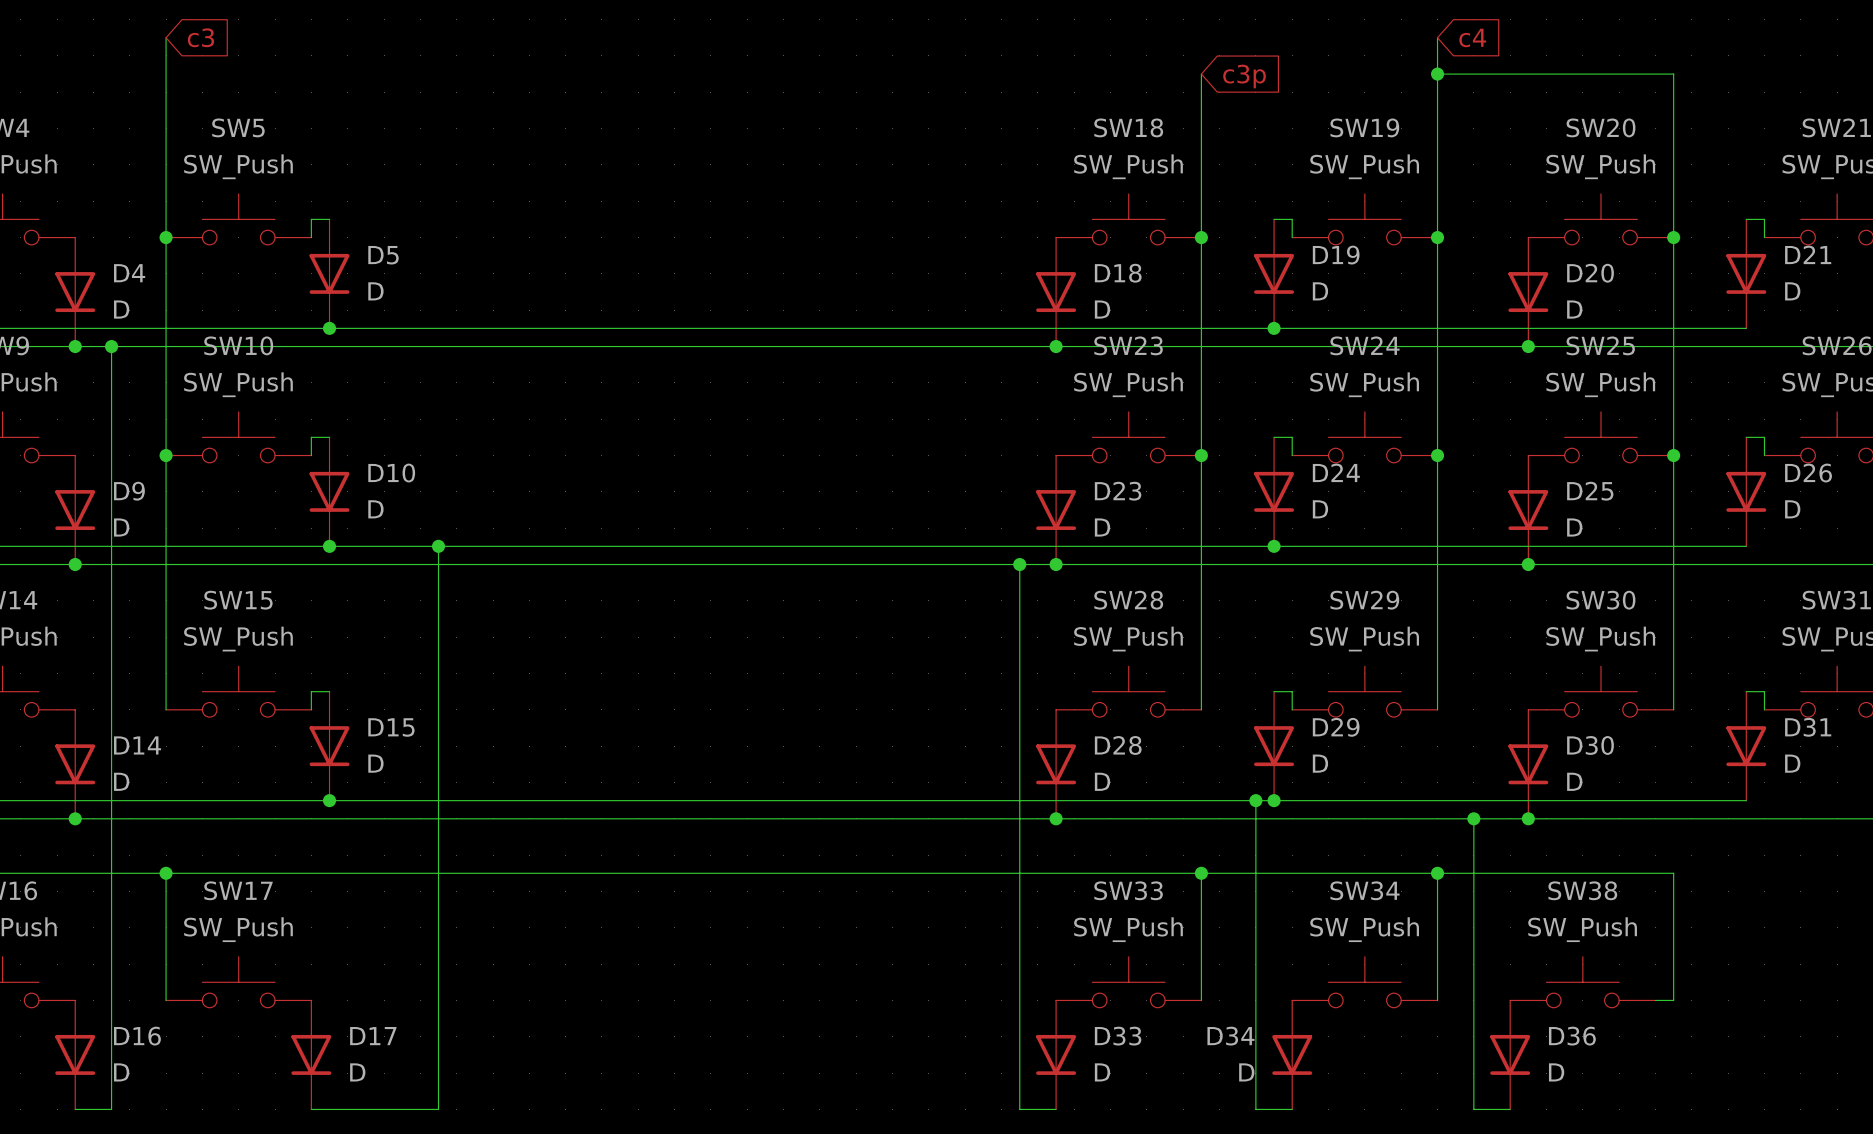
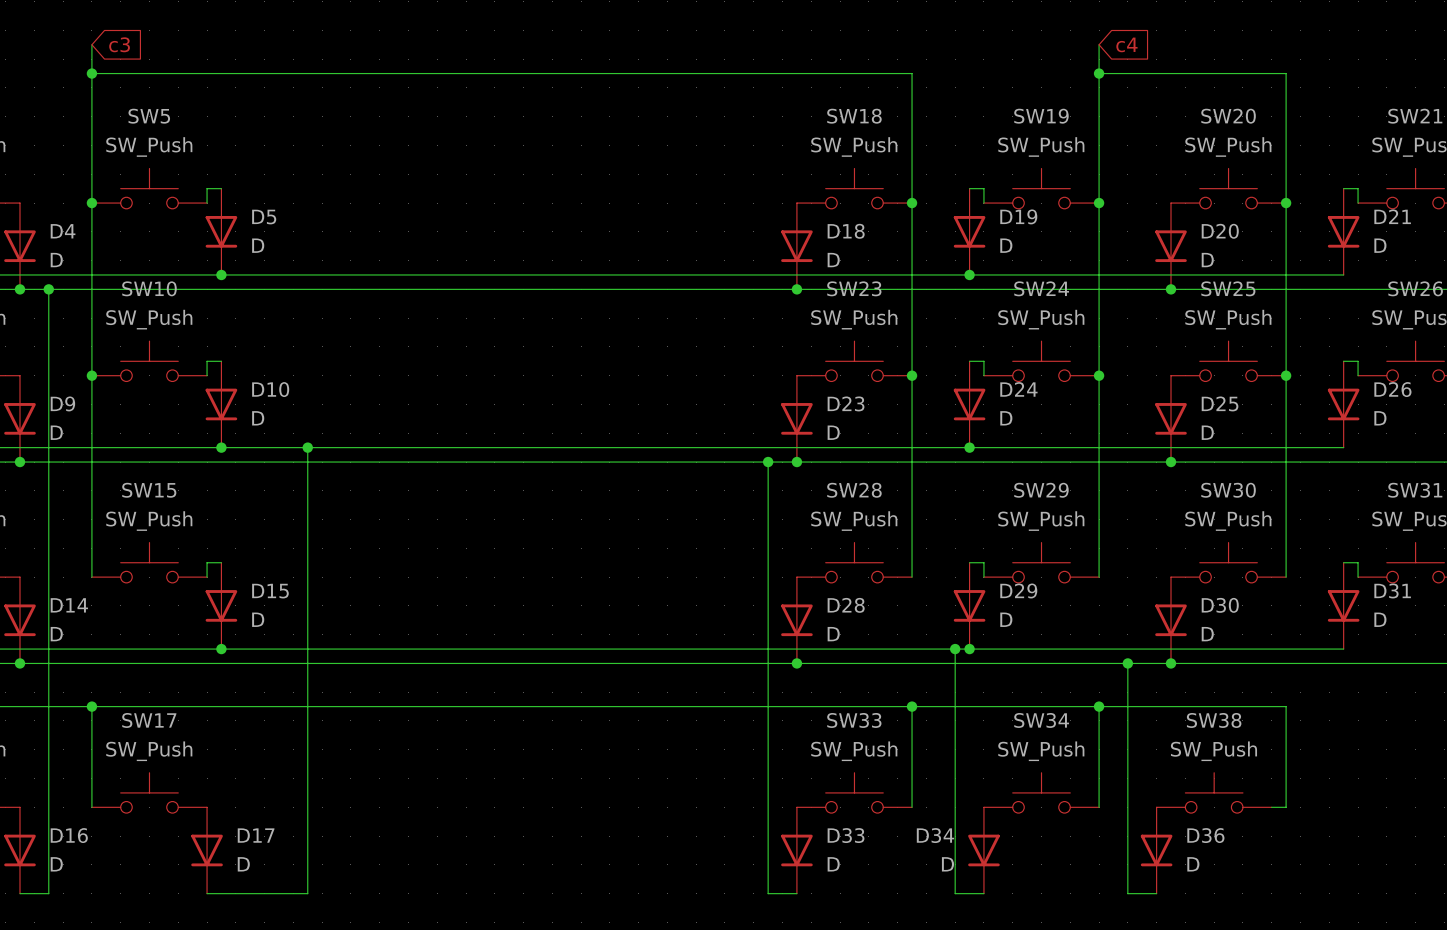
wire: none -> (91, 73) (912, 73)
junction: none -> (91, 73)
global label: c3p (1244, 76) -> none

